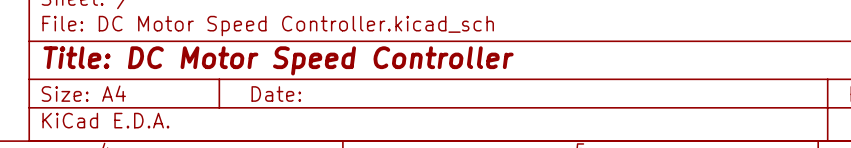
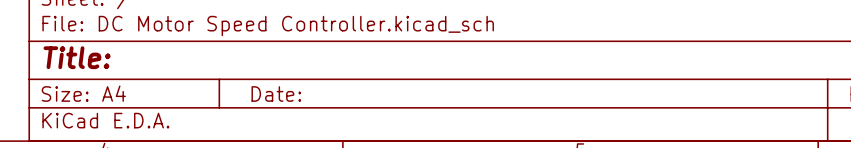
title block: Title: DC Motor Speed Controller (278, 60) -> Title: (77, 57)

